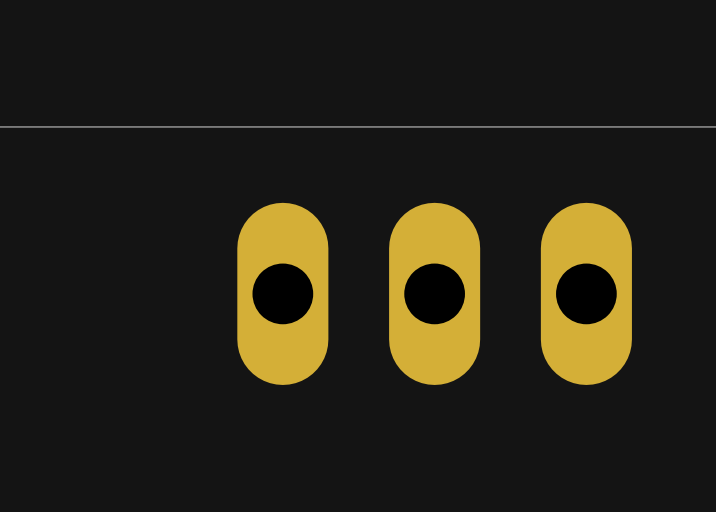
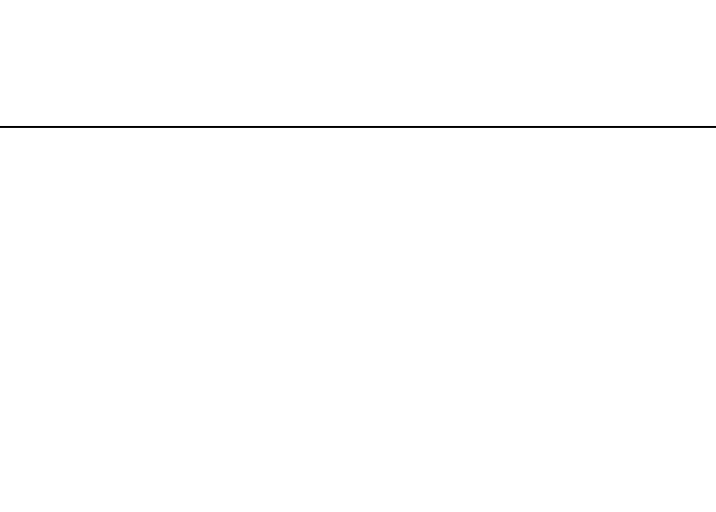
part: (434, 293) -> none

